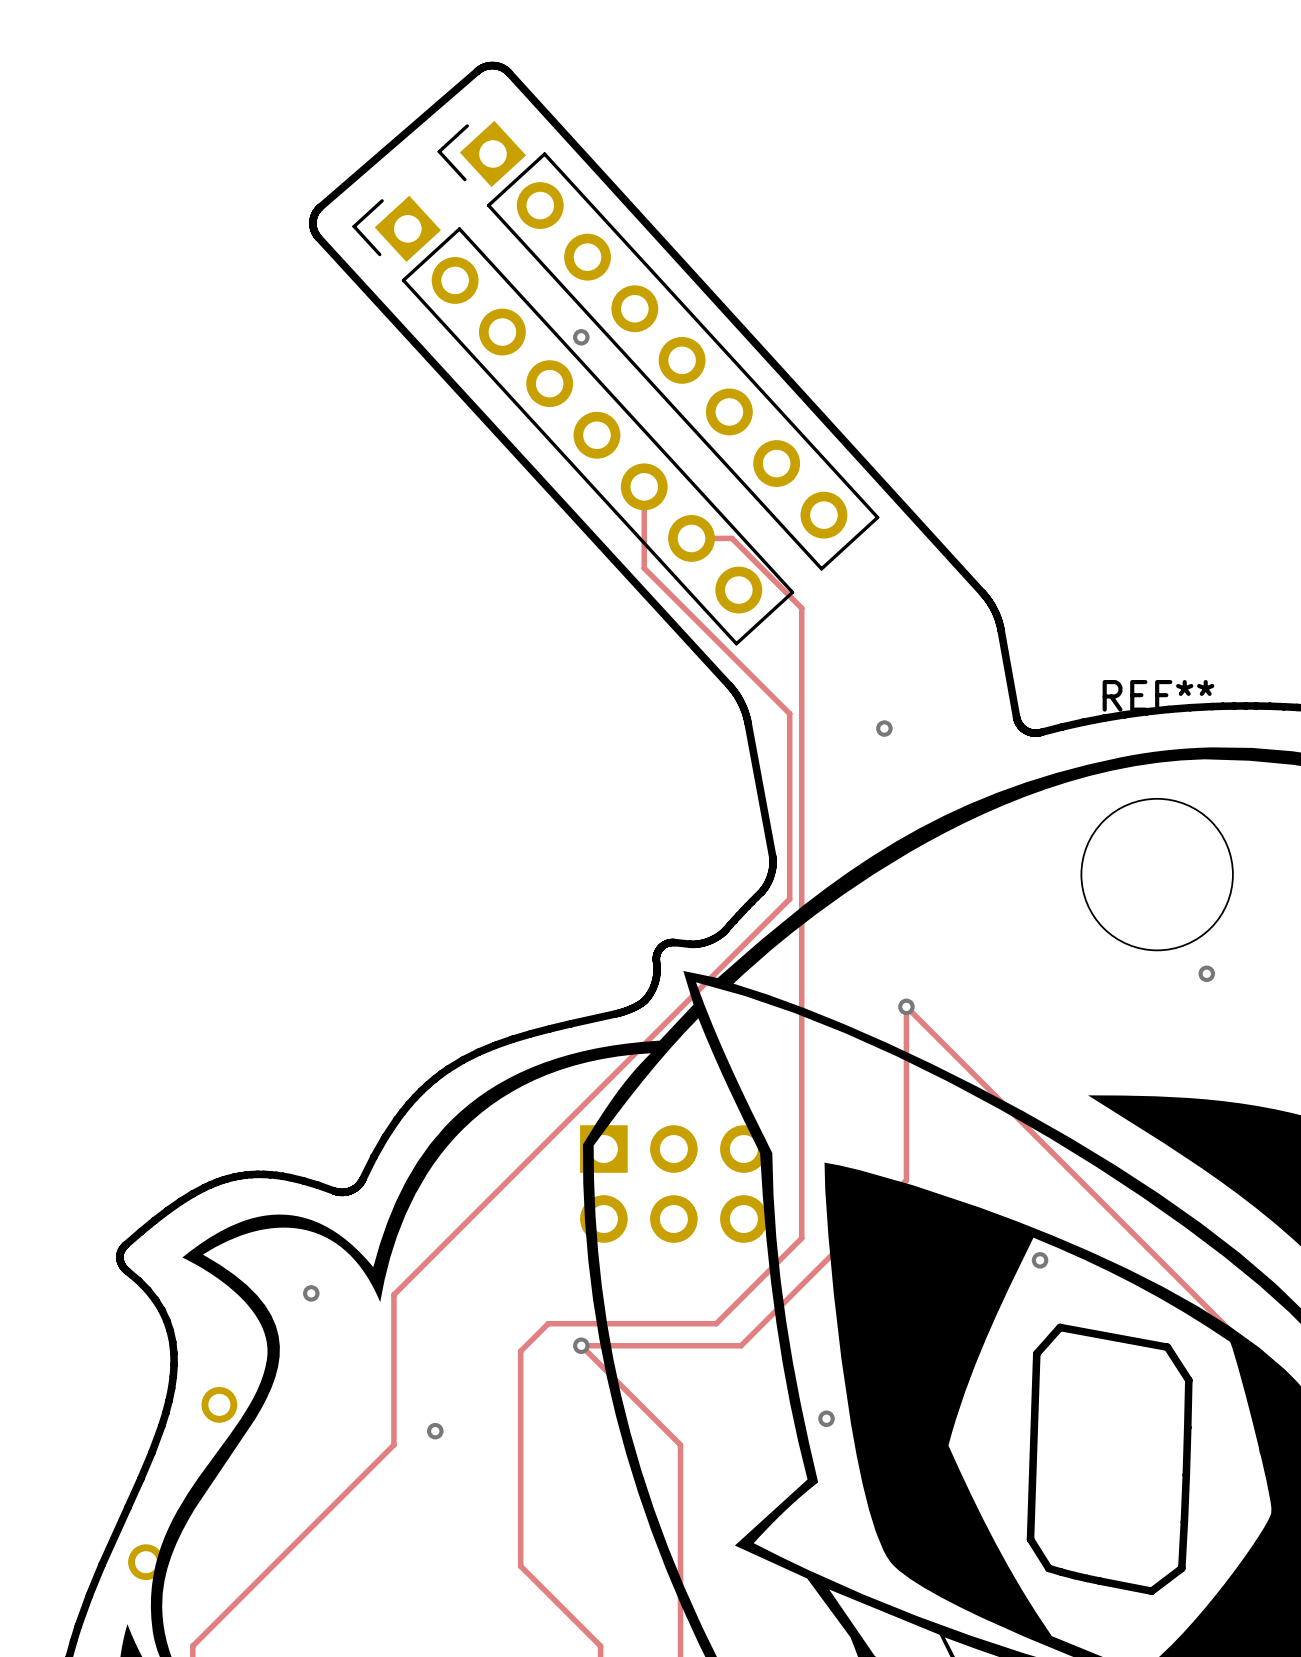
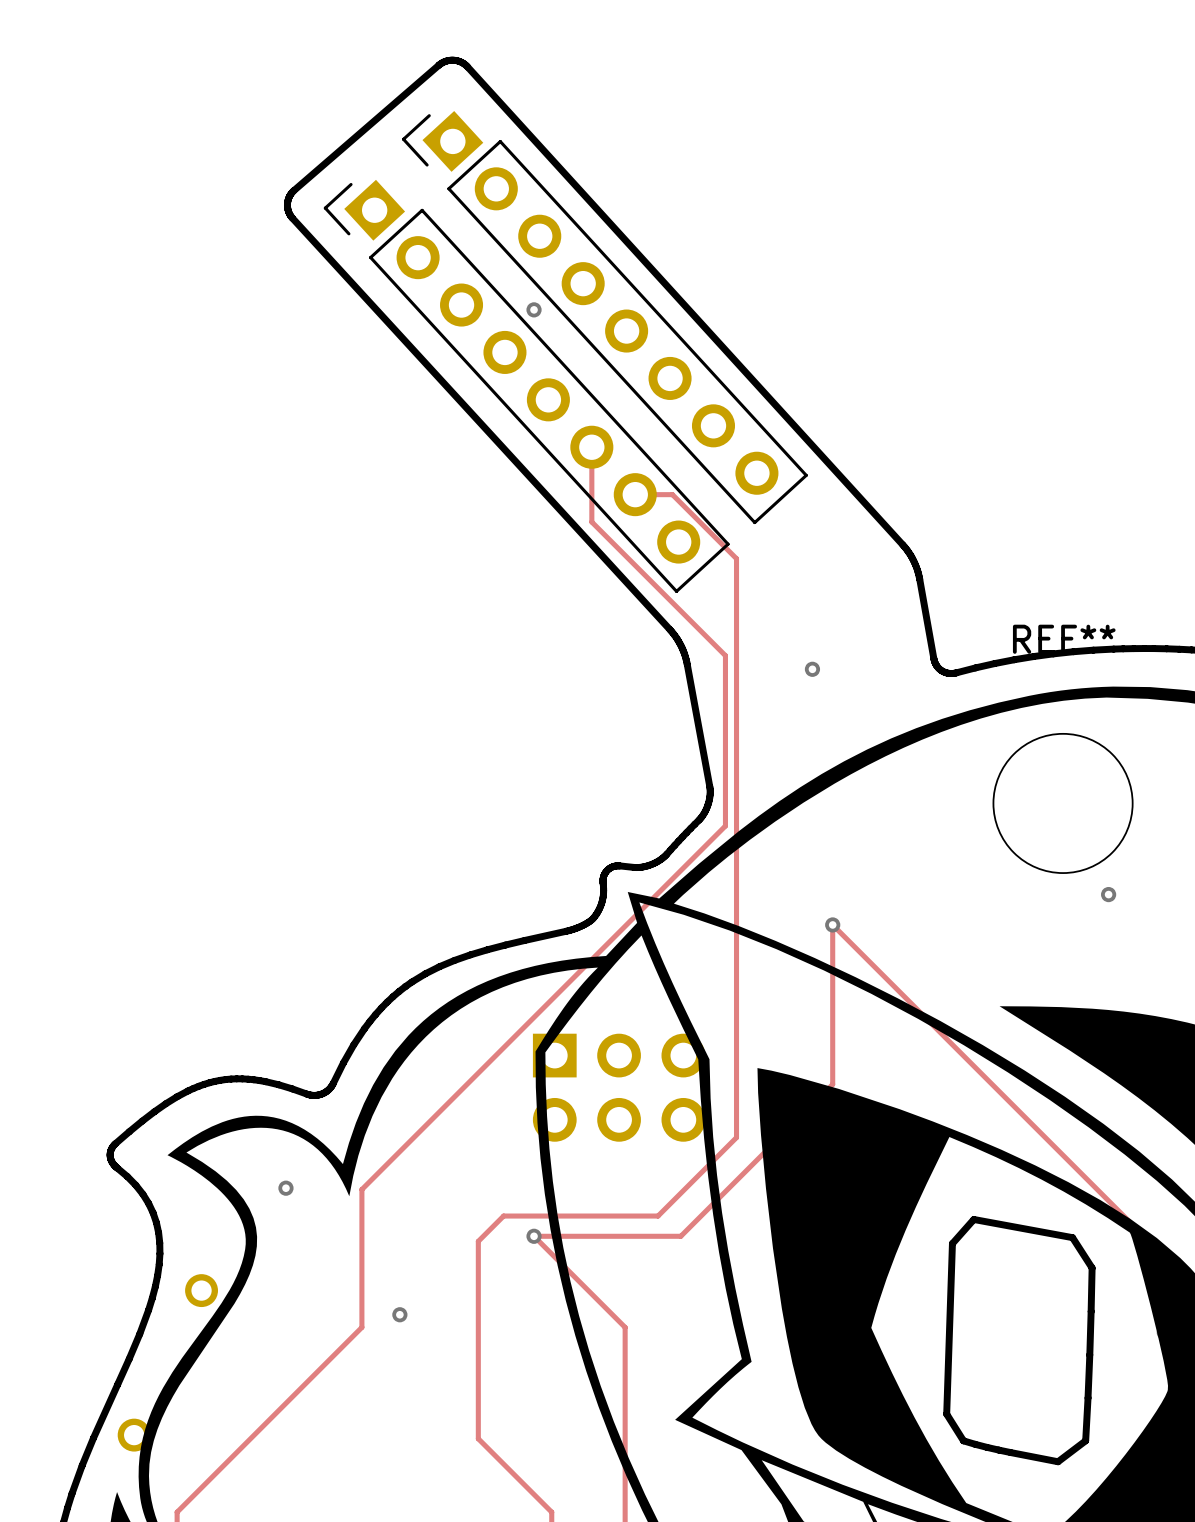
via: (1040, 1260) -> none
via: (826, 1418) -> none

